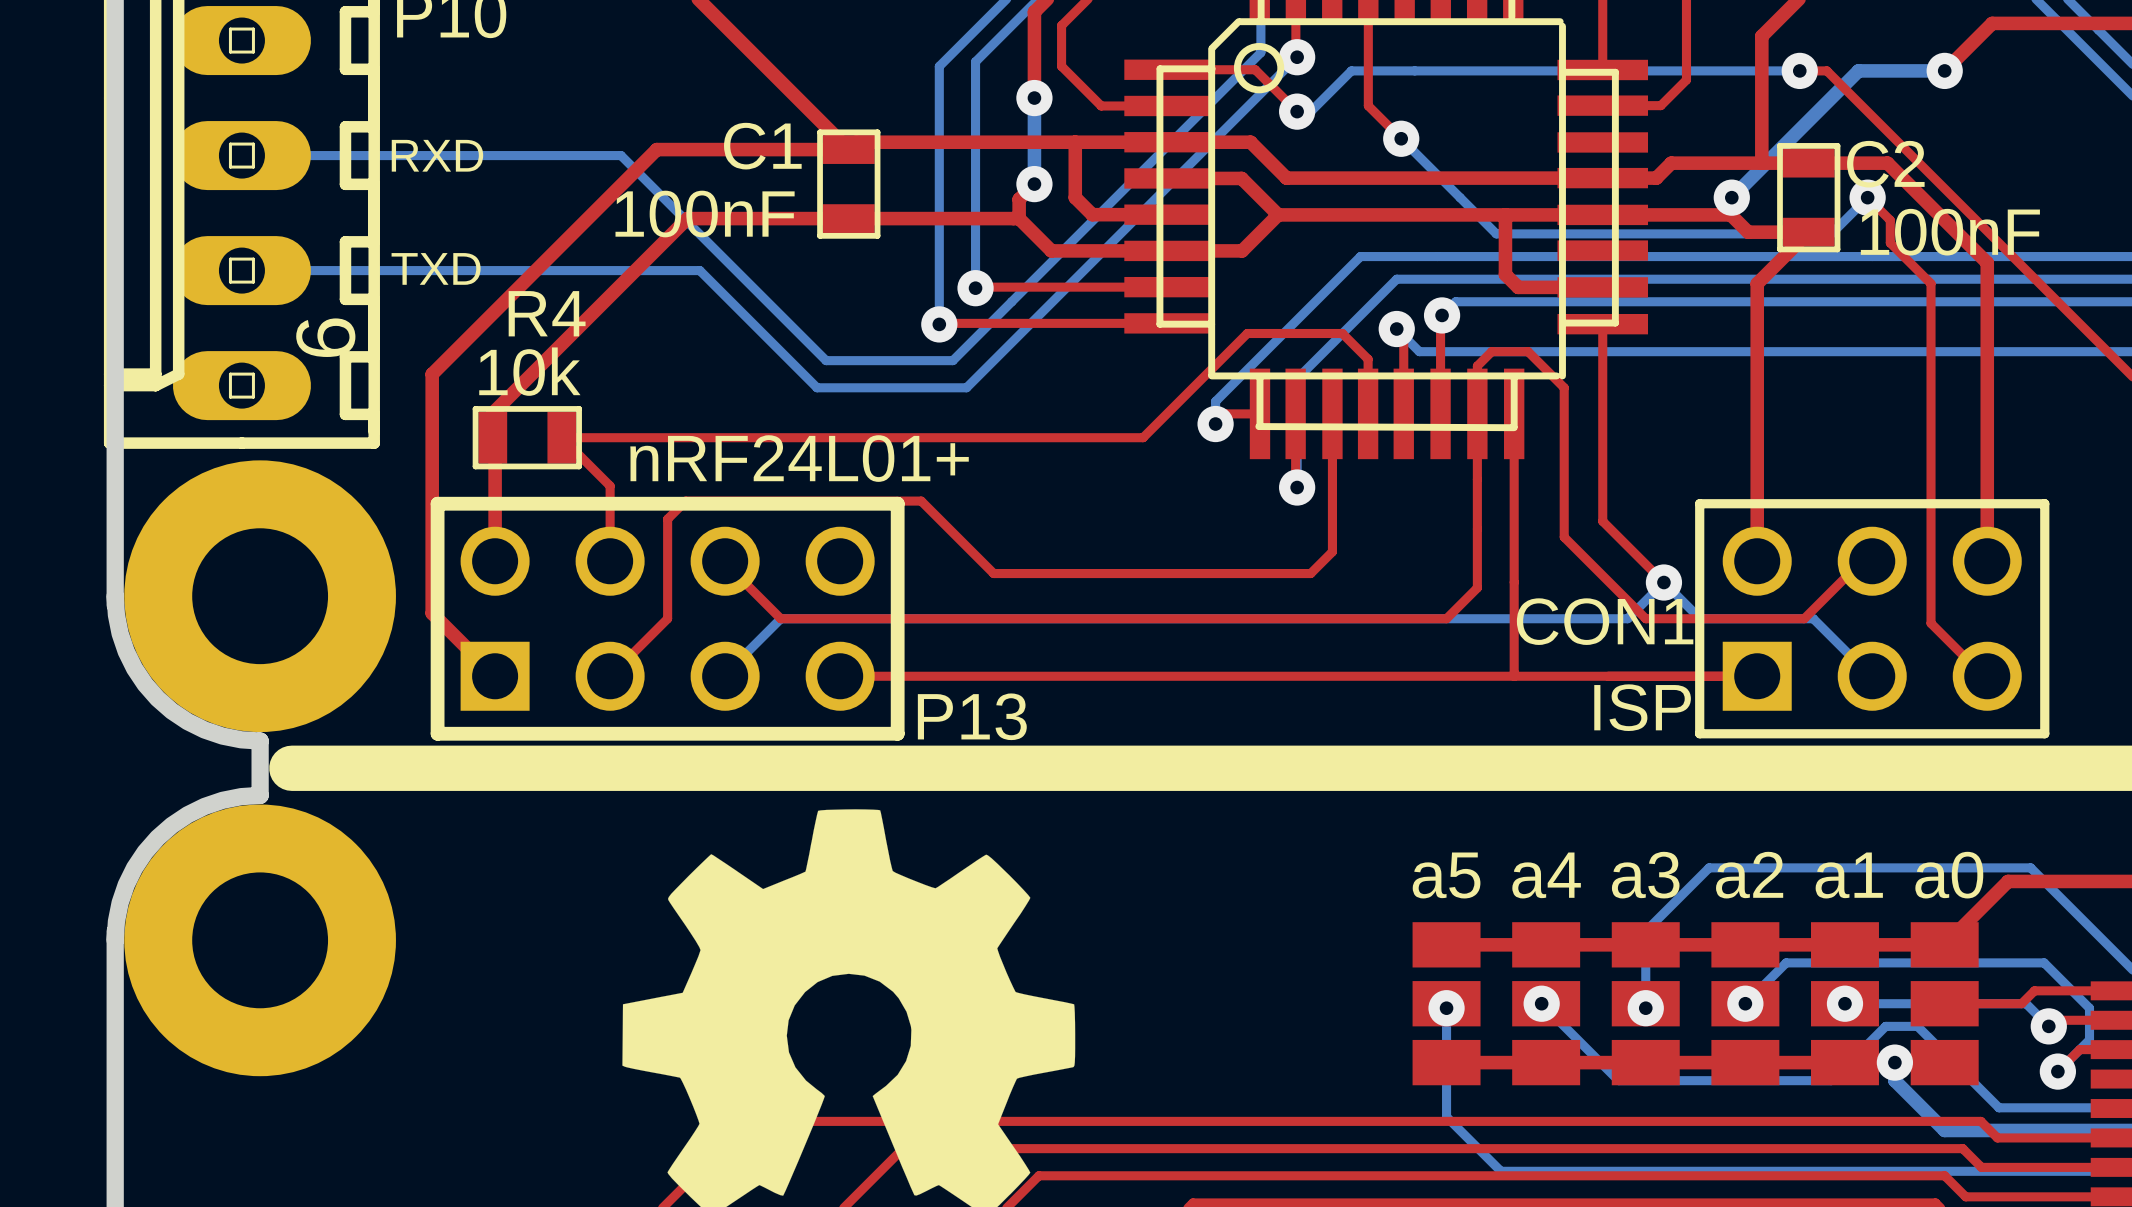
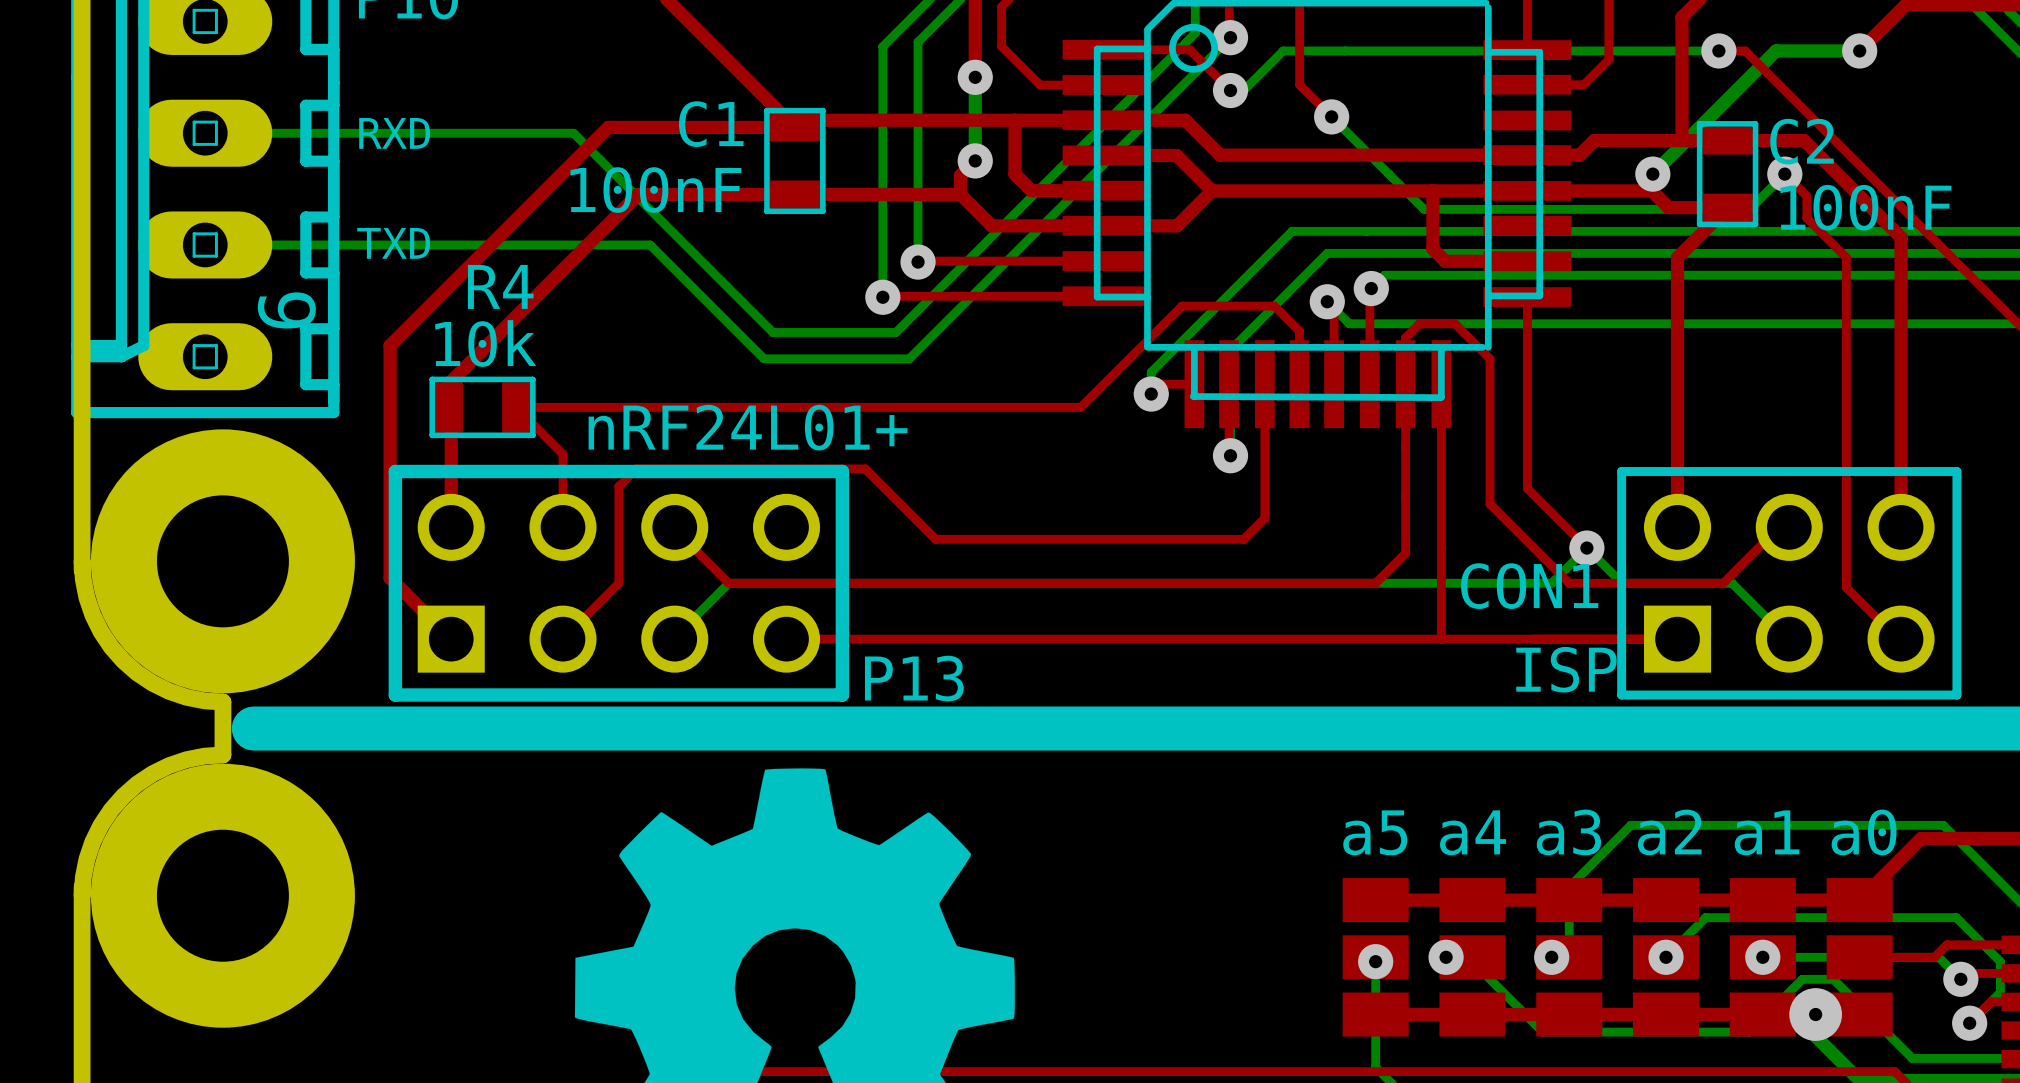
via position: (1541, 1003) -> (1446, 957)
via position: (1645, 1008) -> (1551, 957)
via size: [1876, 1044, 1914, 1081] -> [1789, 988, 1843, 1041]

